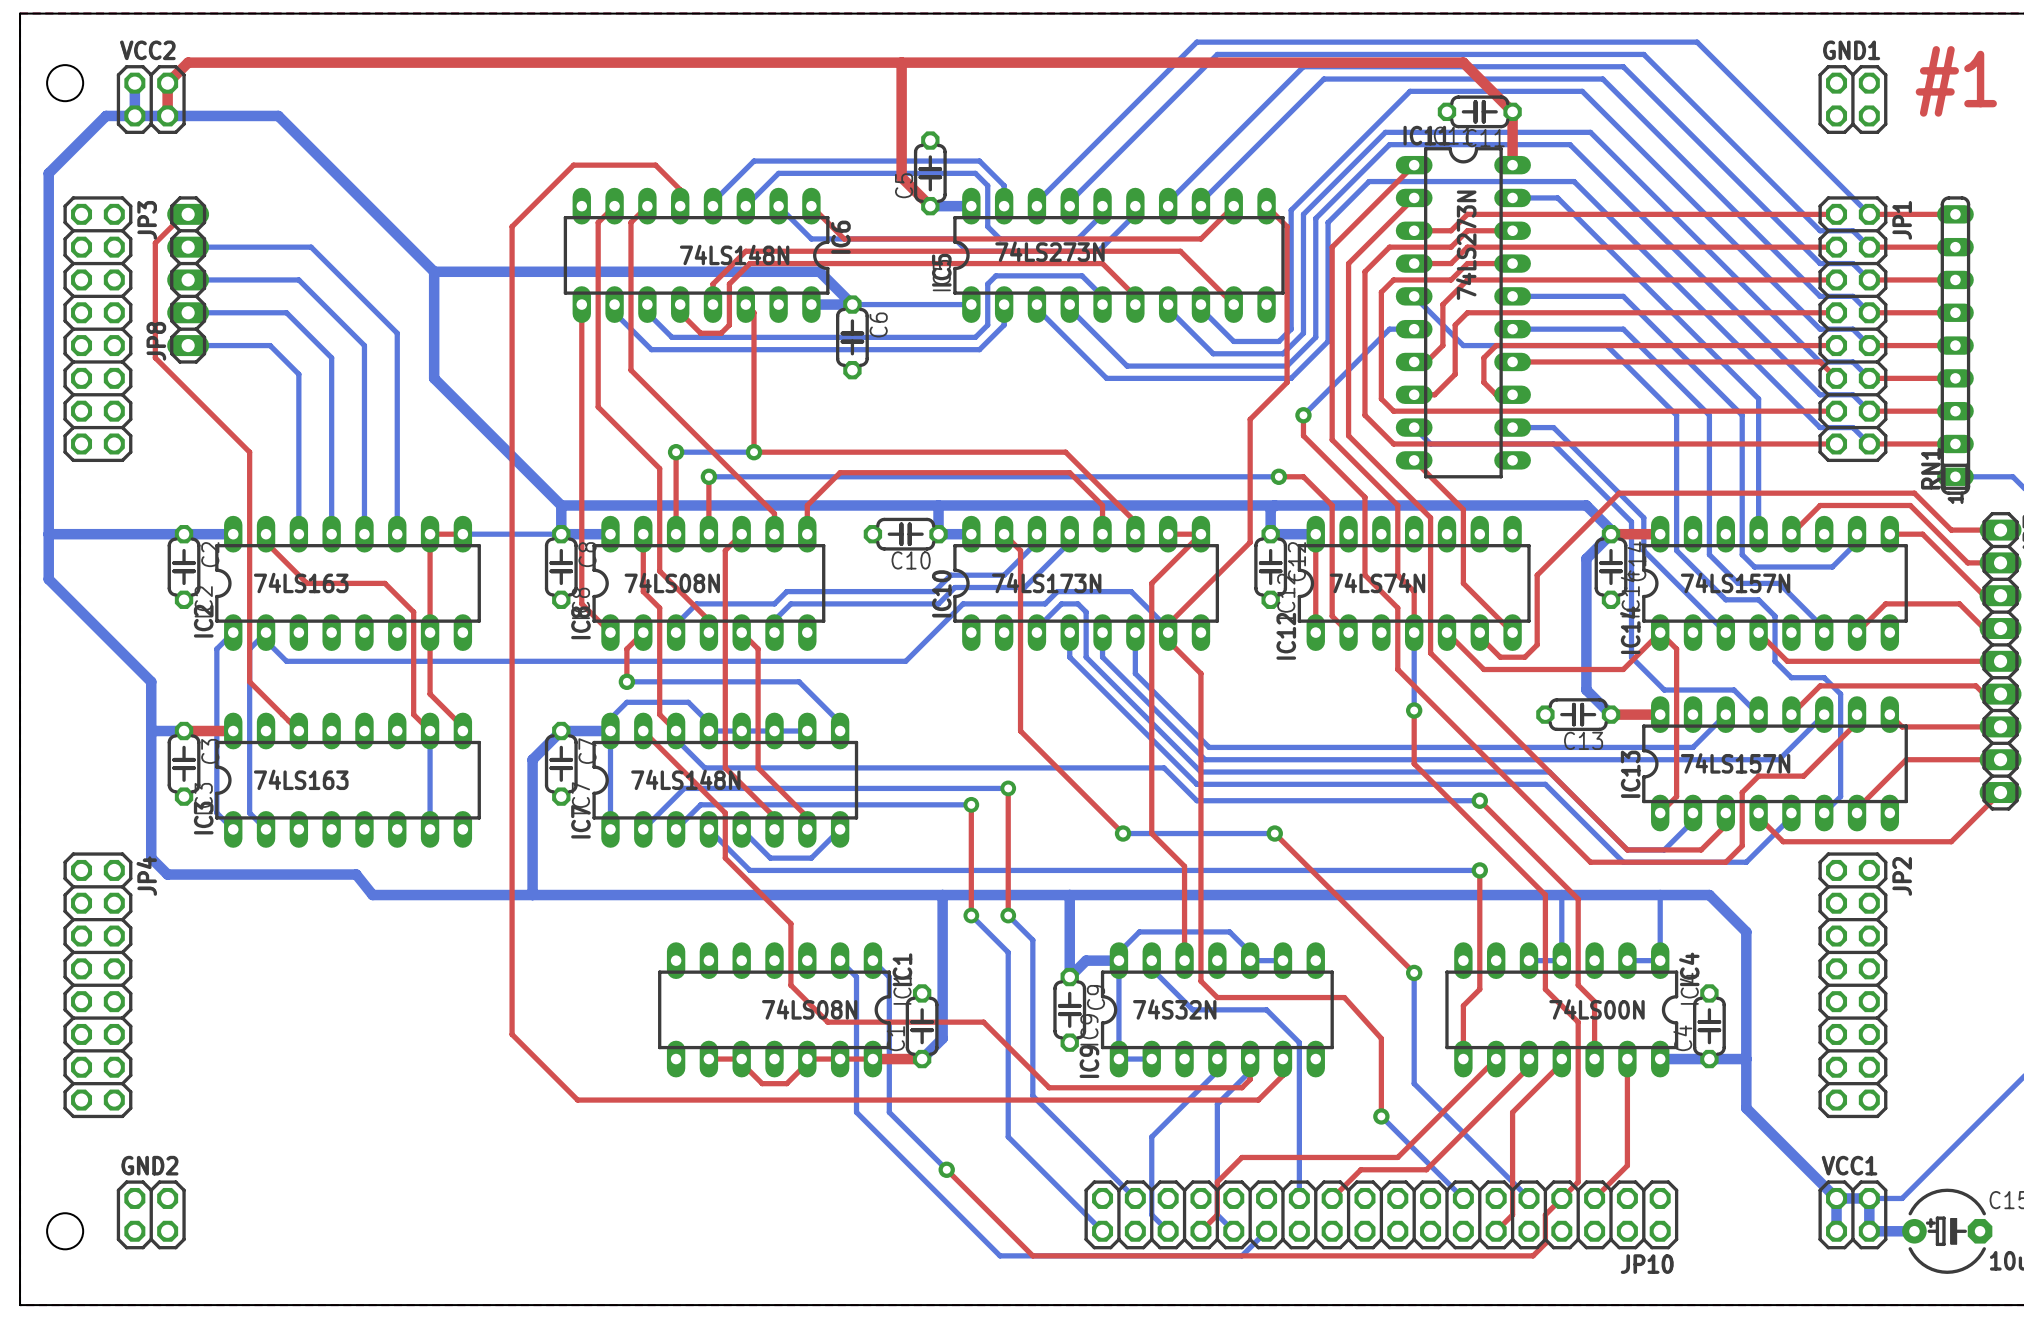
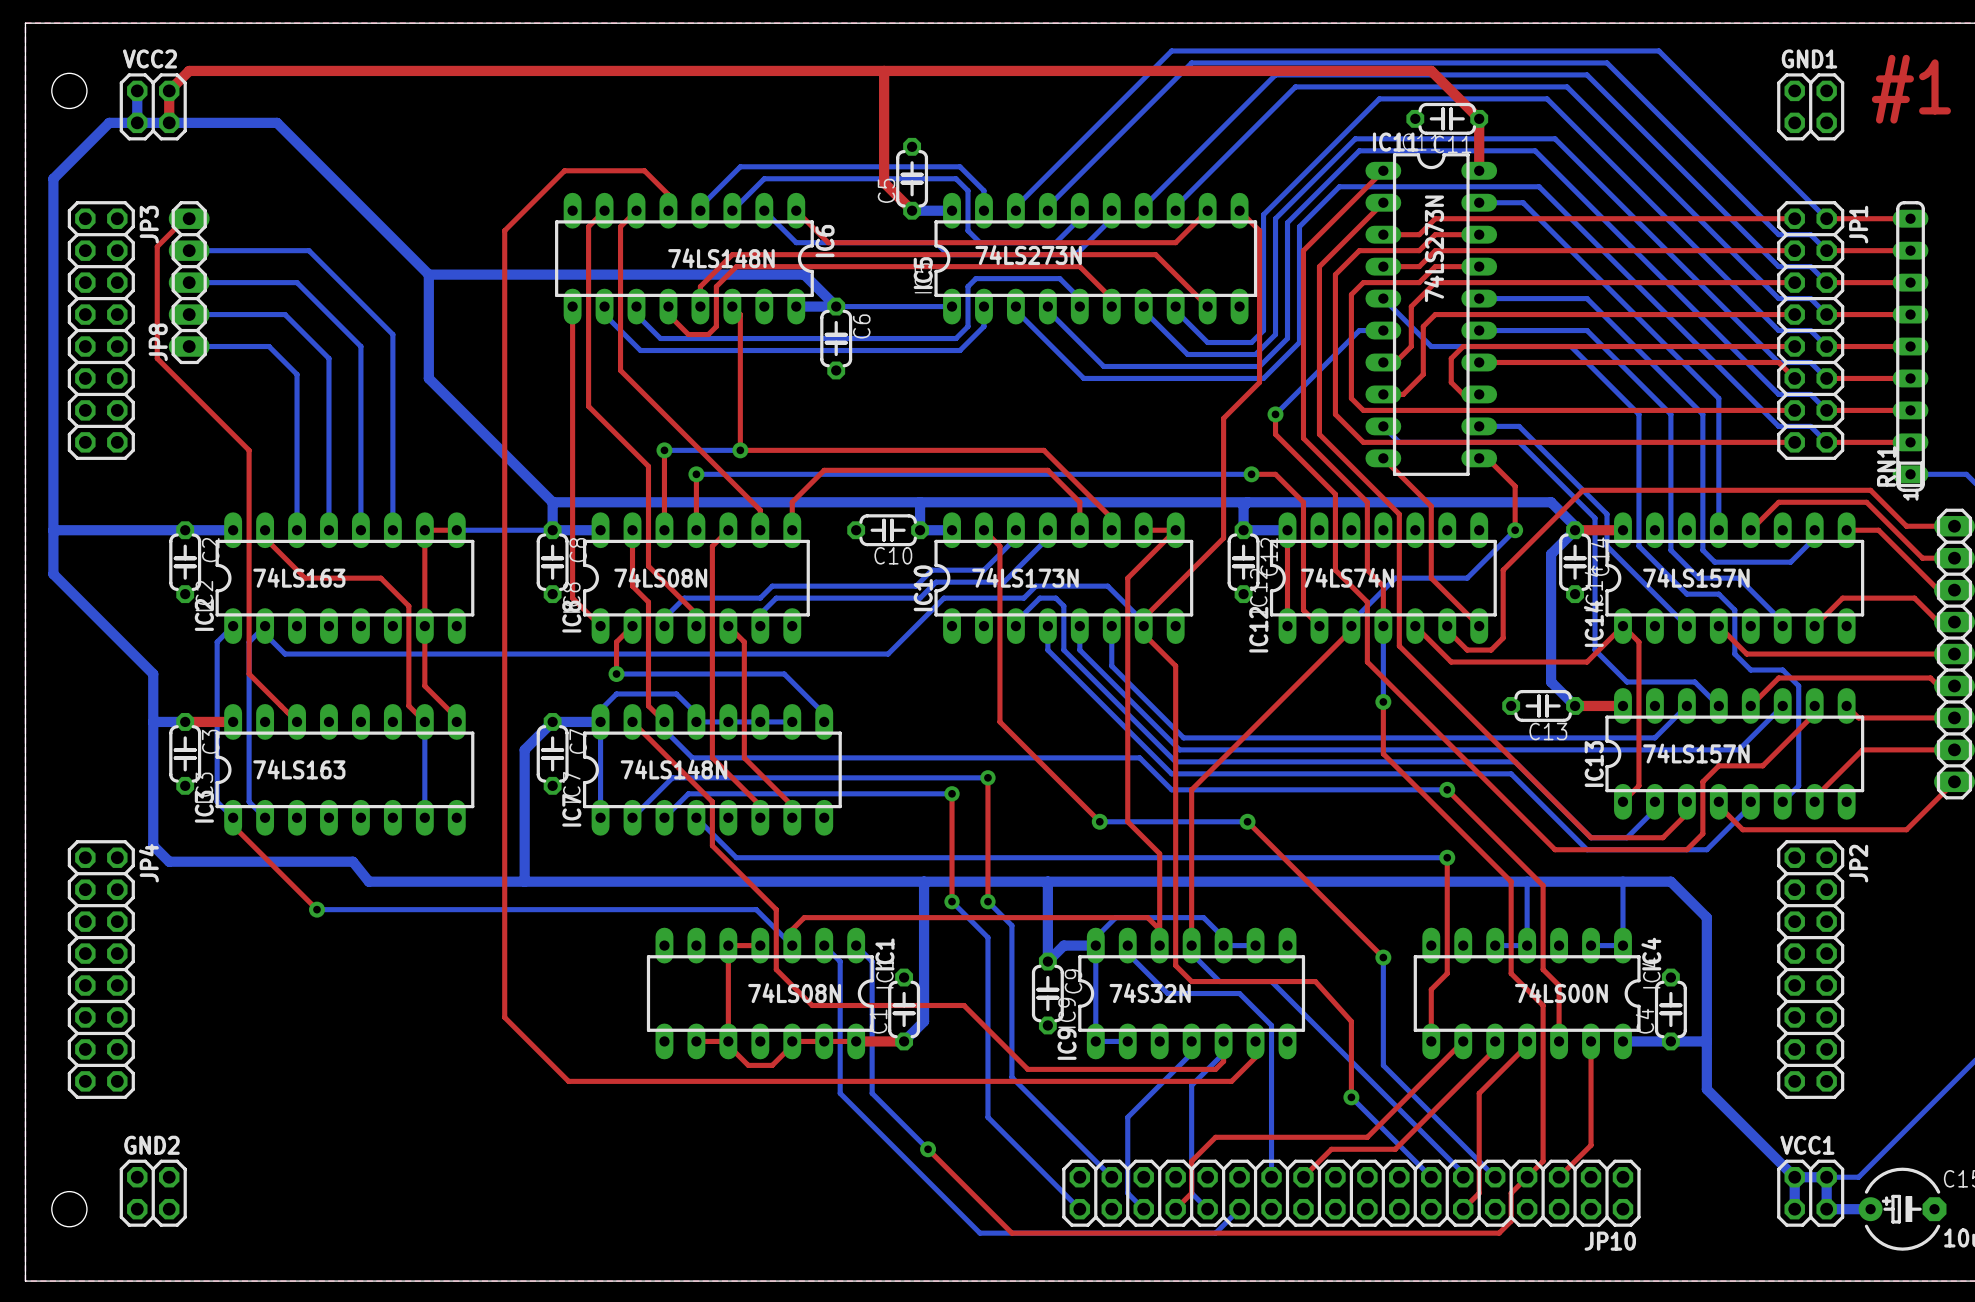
top track: none -> (1479, 458) (1487, 458) (1515, 486) (1515, 530)
bottom track: none -> (1515, 530) (1467, 578) (1395, 578) (1351, 622) (1351, 626)
via: none -> (1515, 530)
top track: none -> (1351, 626) (1351, 630) (1191, 789) (1191, 945)
top track: none -> (233, 817) (233, 825) (317, 909)
bottom track: (741, 829) (770, 858) (811, 858) (840, 829) -> none
bottom track: none -> (317, 909) (756, 909) (792, 945)
via: none -> (317, 909)
top track: none -> (1159, 929) (1147, 917) (804, 917) (792, 929) (792, 945)
top track: none -> (760, 945) (728, 945) (728, 1041)
bottom track: none -> (1191, 945) (1191, 953) (1219, 981) (1271, 981) (1463, 1173) (1463, 1177)

